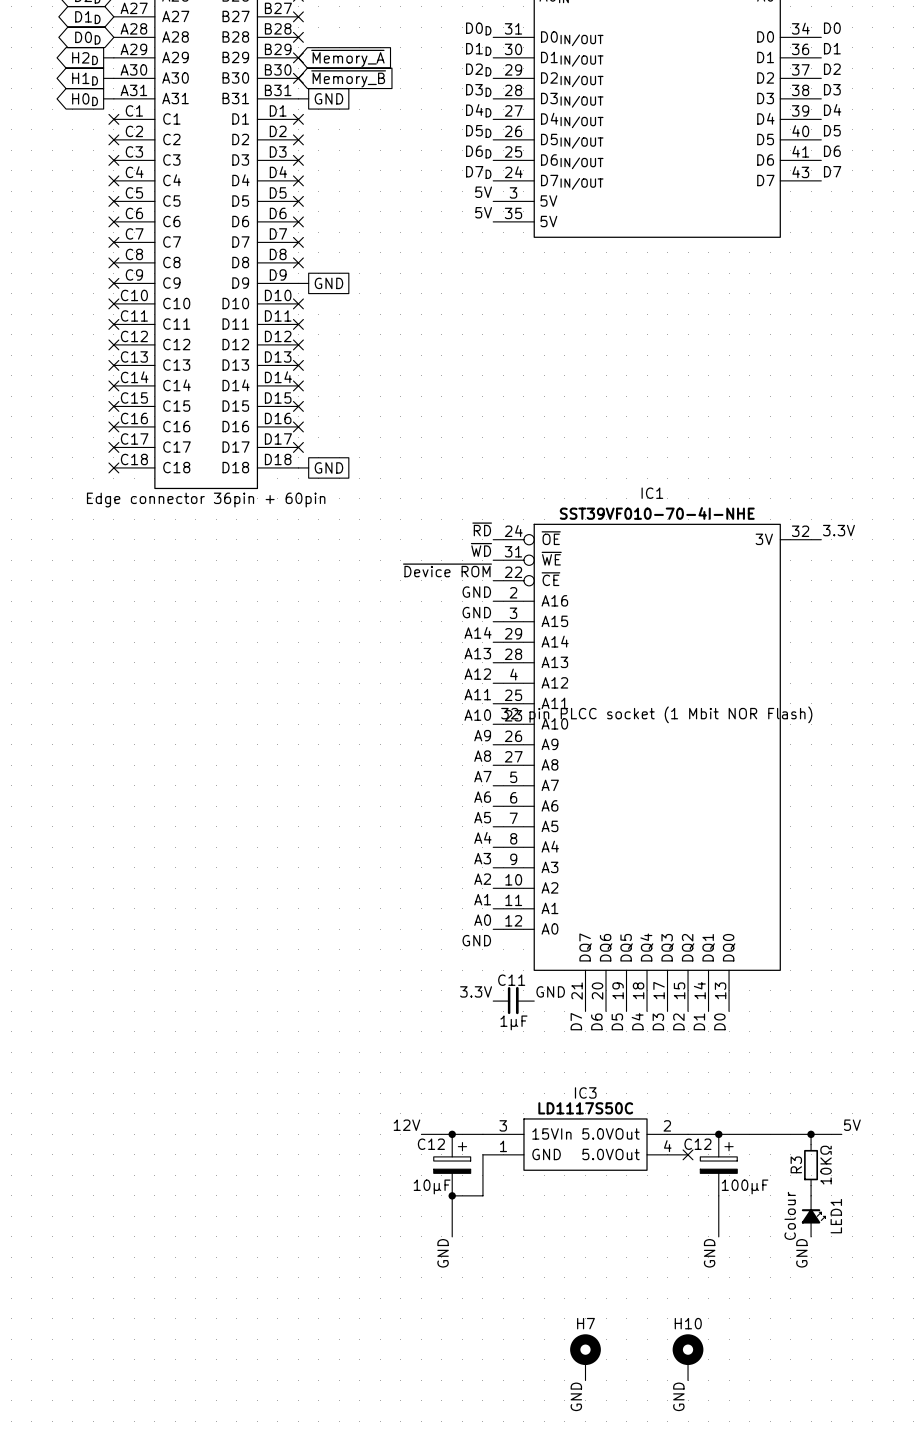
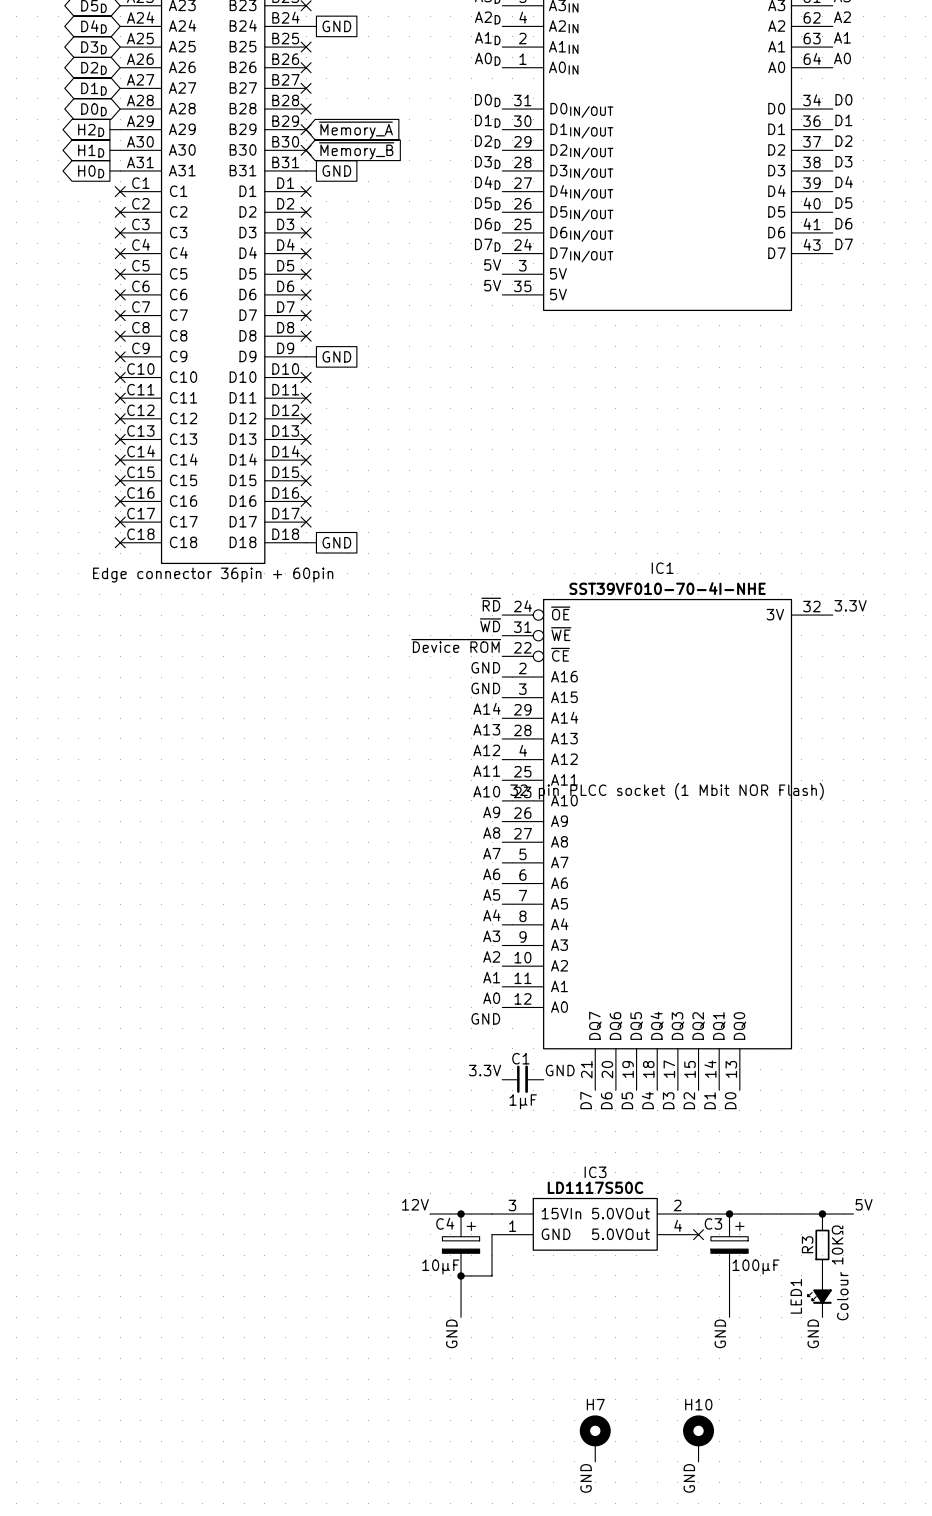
C11 name: C11 (511, 980) -> C1 (520, 1058)
C12 name: C12 (431, 1144) -> C4 (445, 1223)
C12 name: C12 (697, 1144) -> C3 (713, 1223)
LED1 rotation: 0° (813, 1216) -> 180° (819, 1296)

